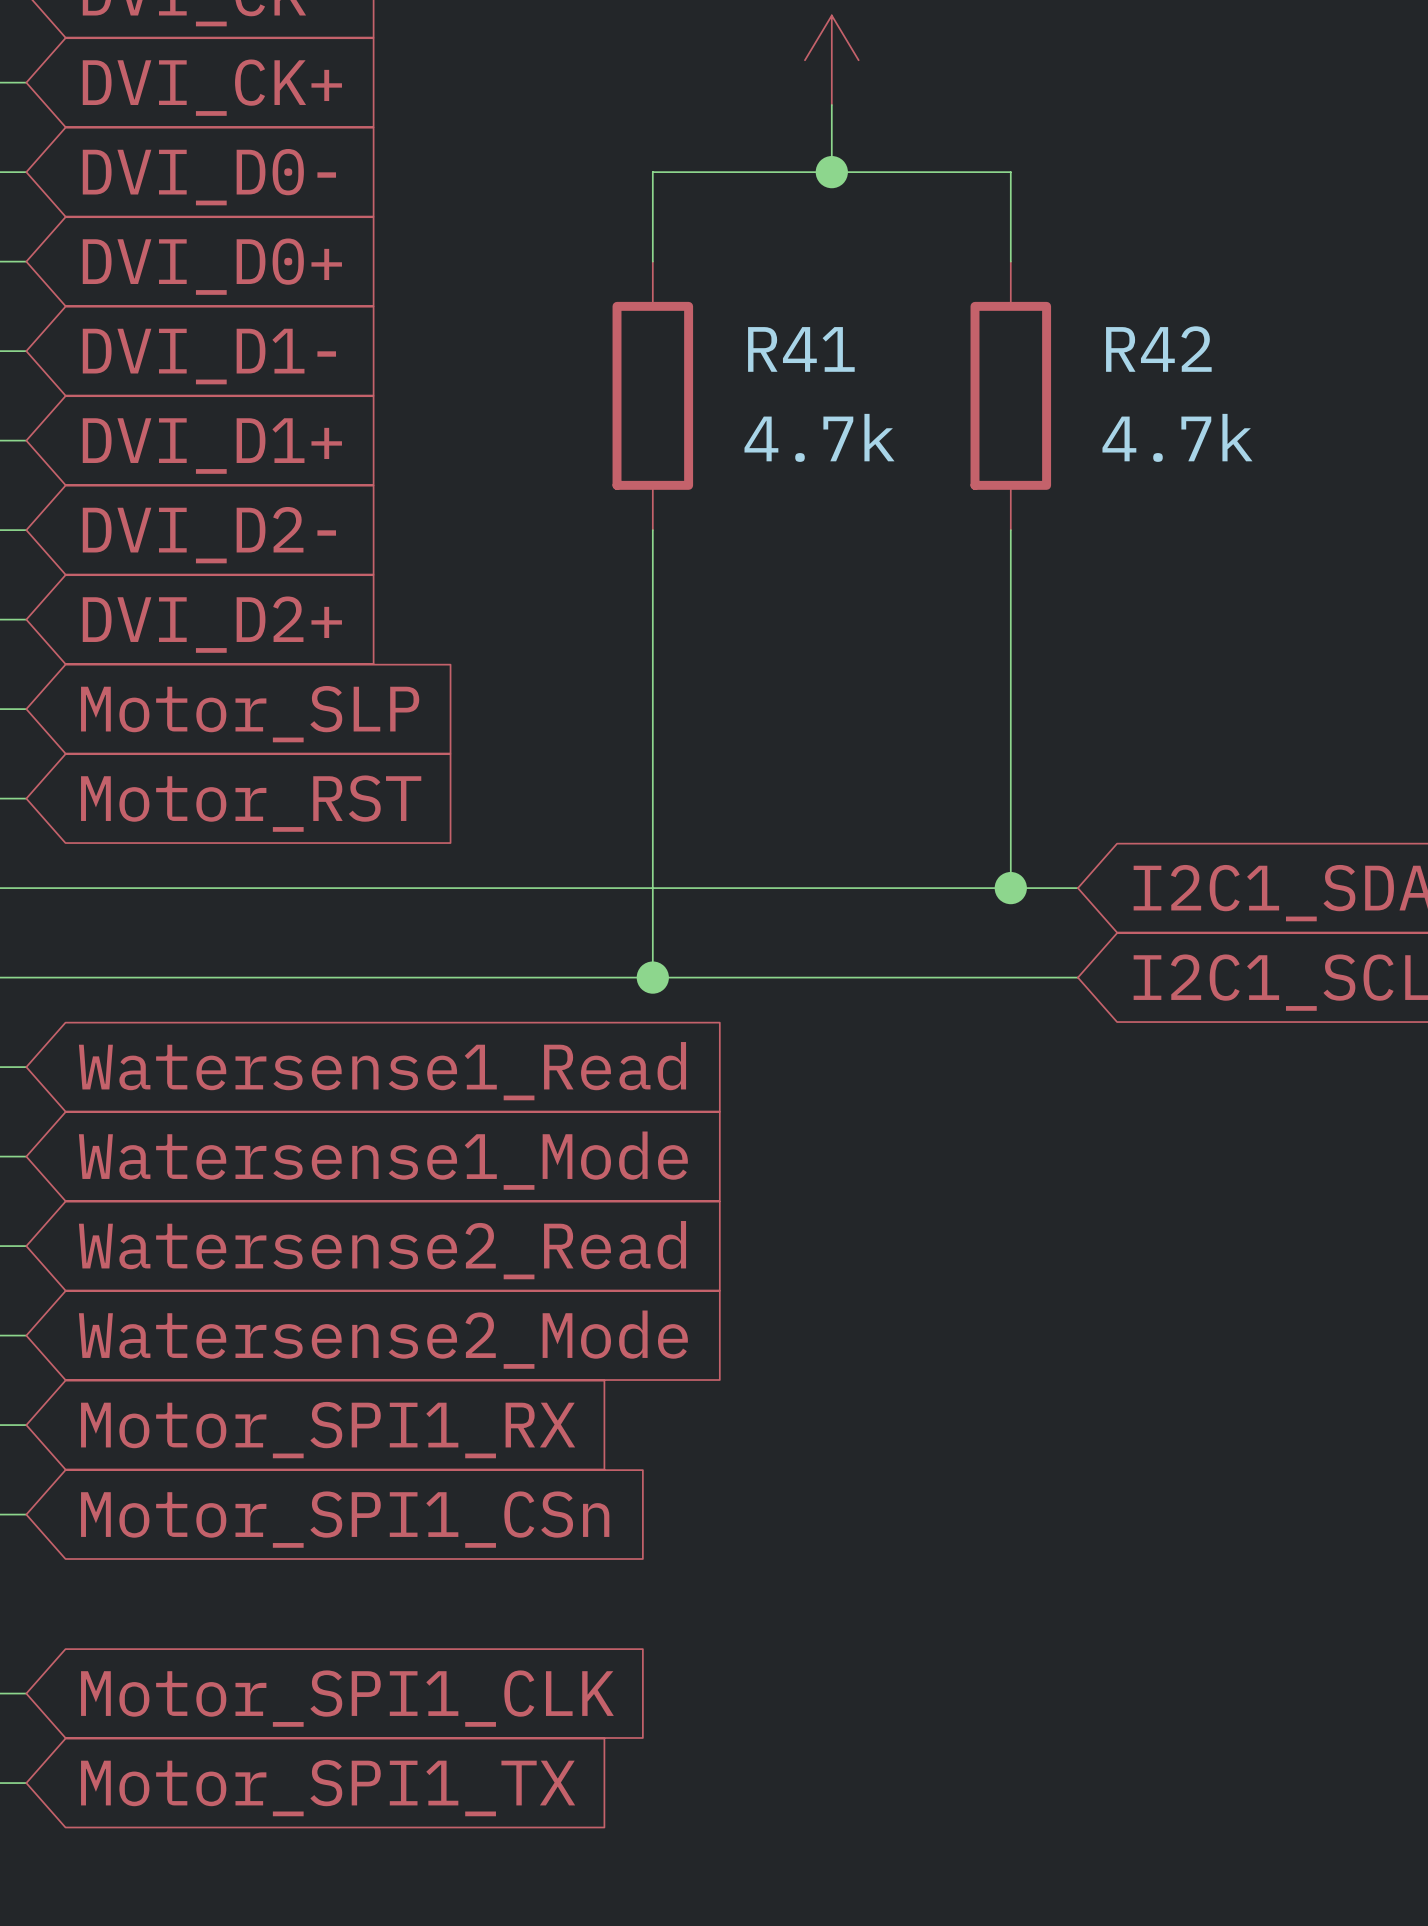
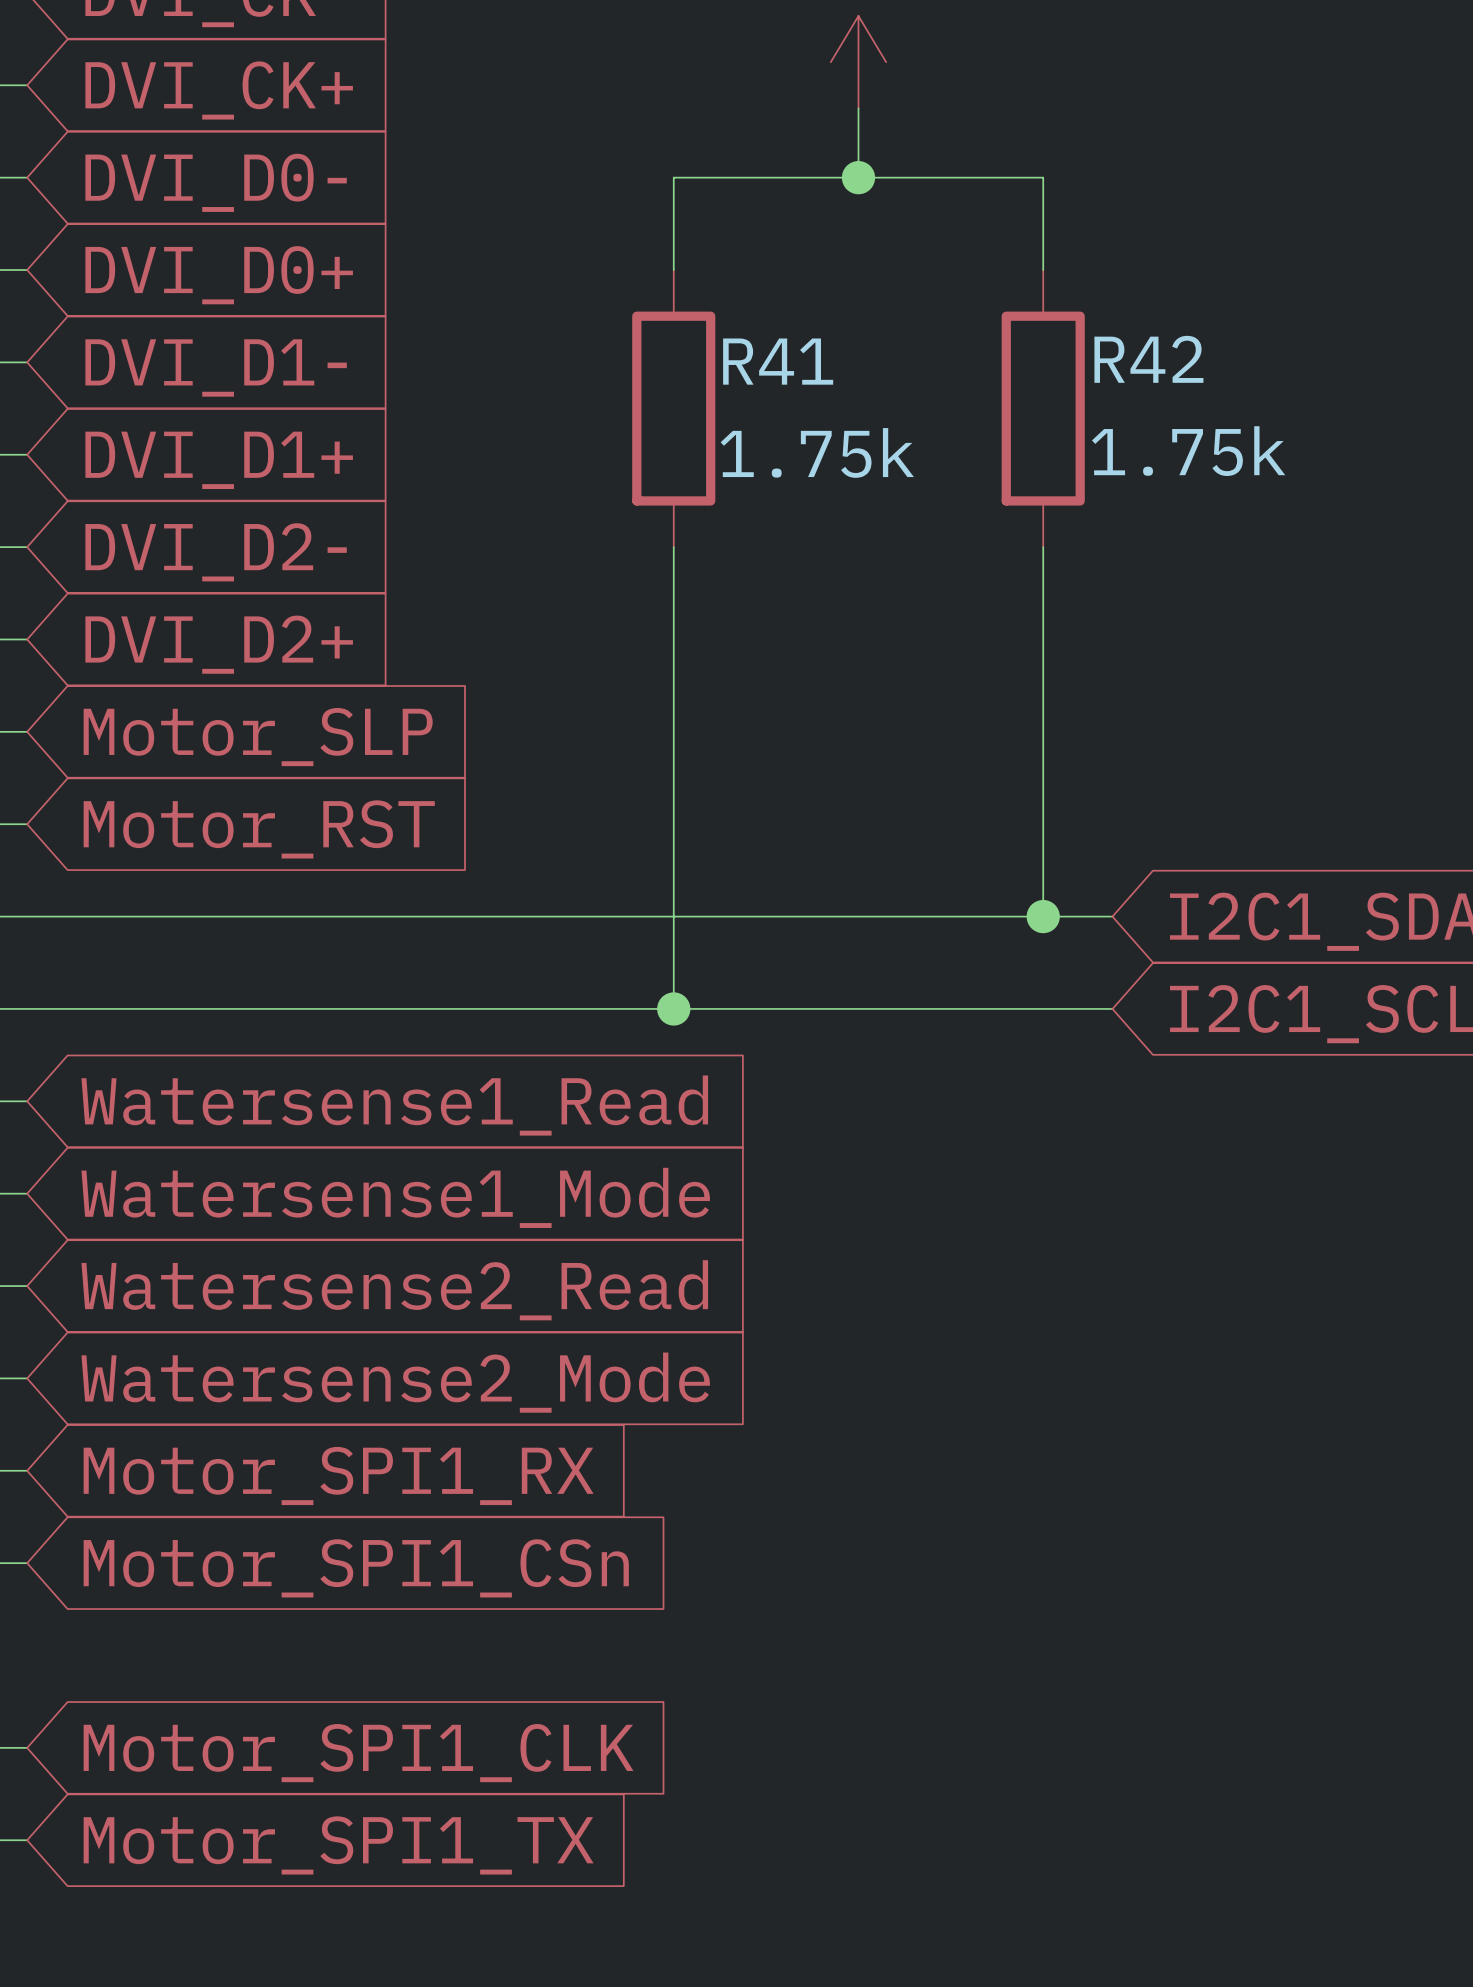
R41 name position: R41 (801, 349) -> R41 (778, 361)
R42 name position: R42 (1158, 349) -> R42 (1148, 359)
R41 value: 4.7k (819, 437) -> 1.75k (817, 452)
R42 value: 4.7k (1177, 437) -> 1.75k (1188, 451)

